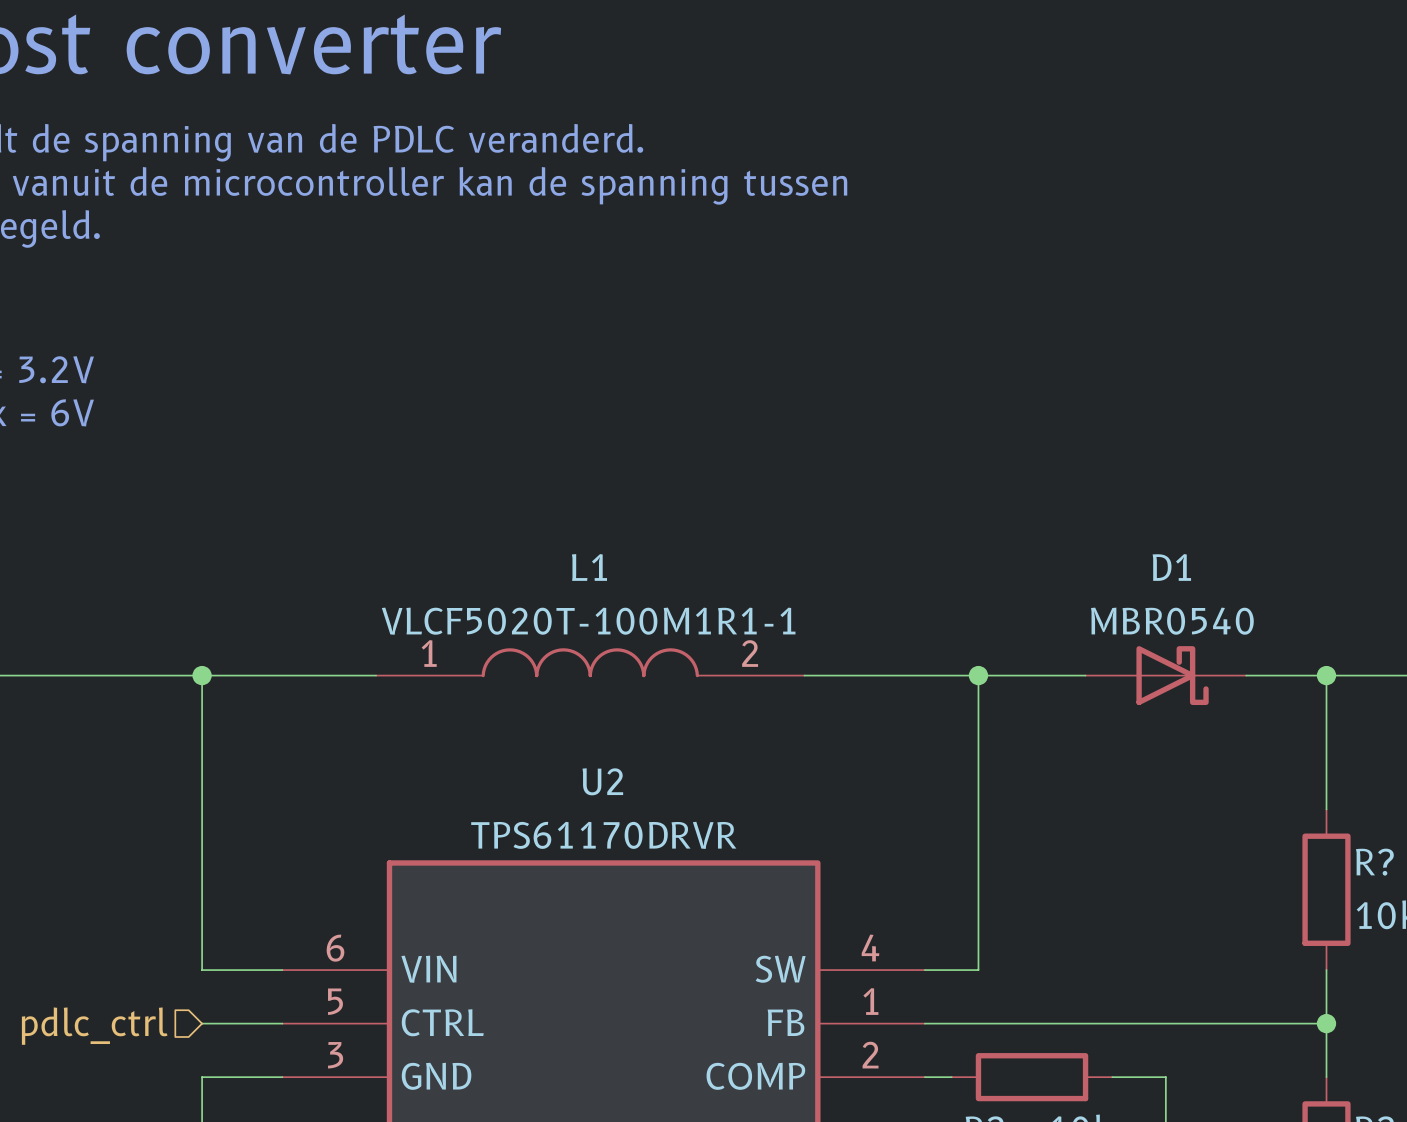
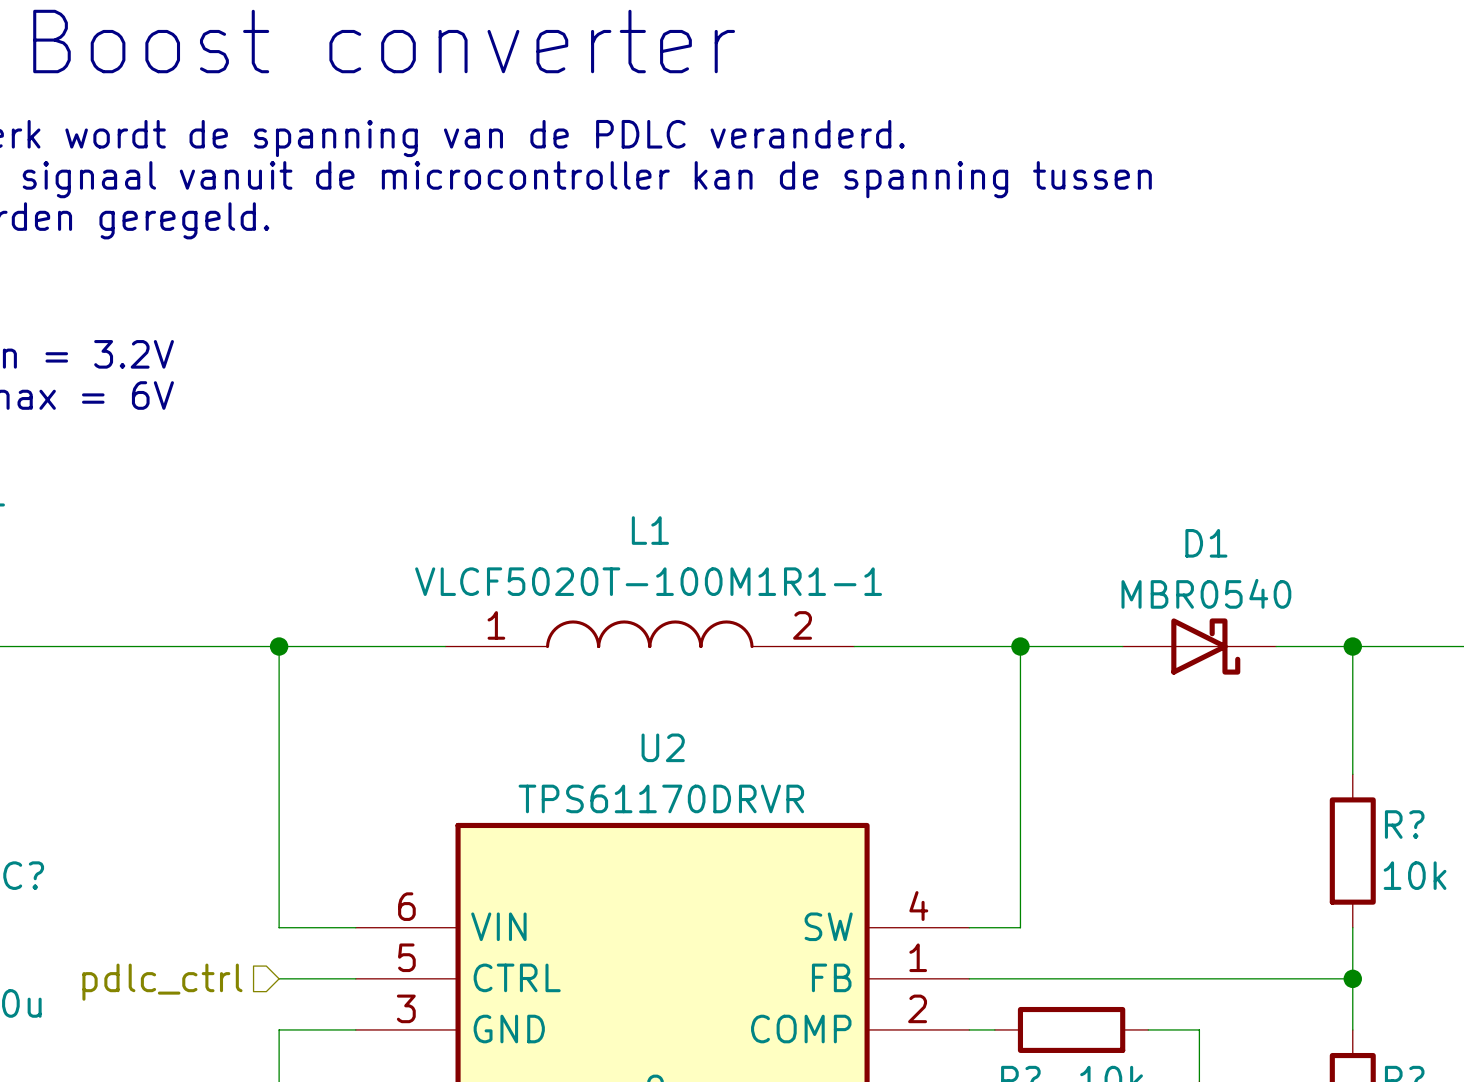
L1 name position: L1 (589, 567) -> L1 (650, 530)
L1 value position: VLCF5020T-100M1R1-1 (588, 621) -> VLCF5020T-100M1R1-1 (648, 581)

